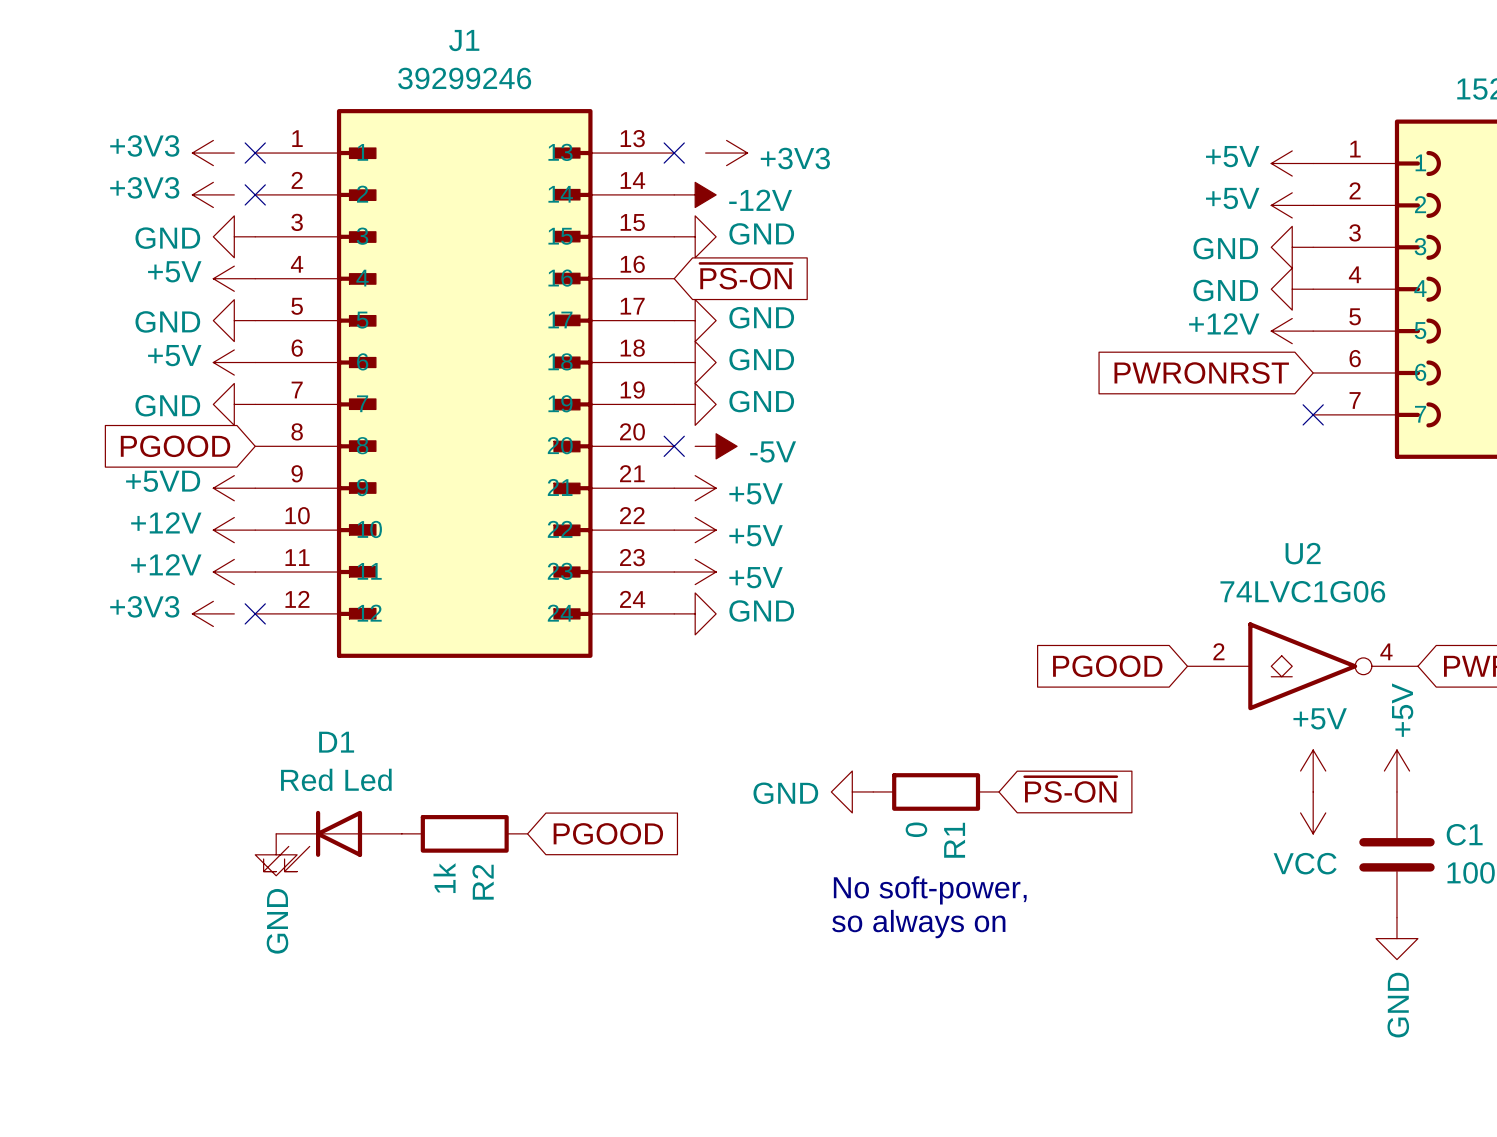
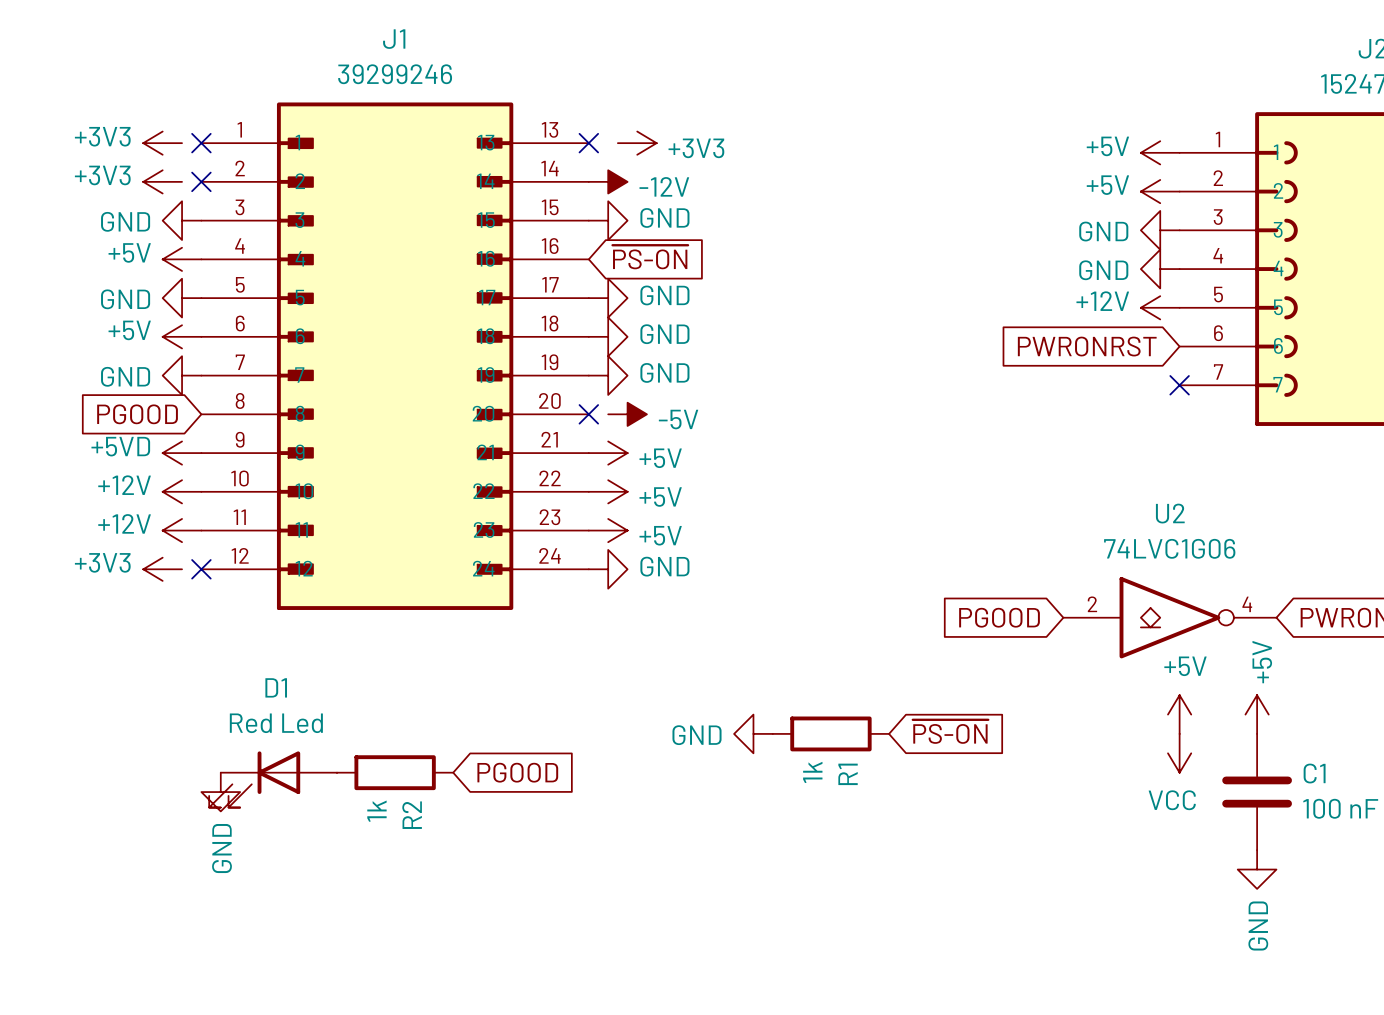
R1 value: 0 (916, 829) -> 1k (812, 772)
text: No soft-power, (930, 890) -> none
text: so always on (918, 924) -> none

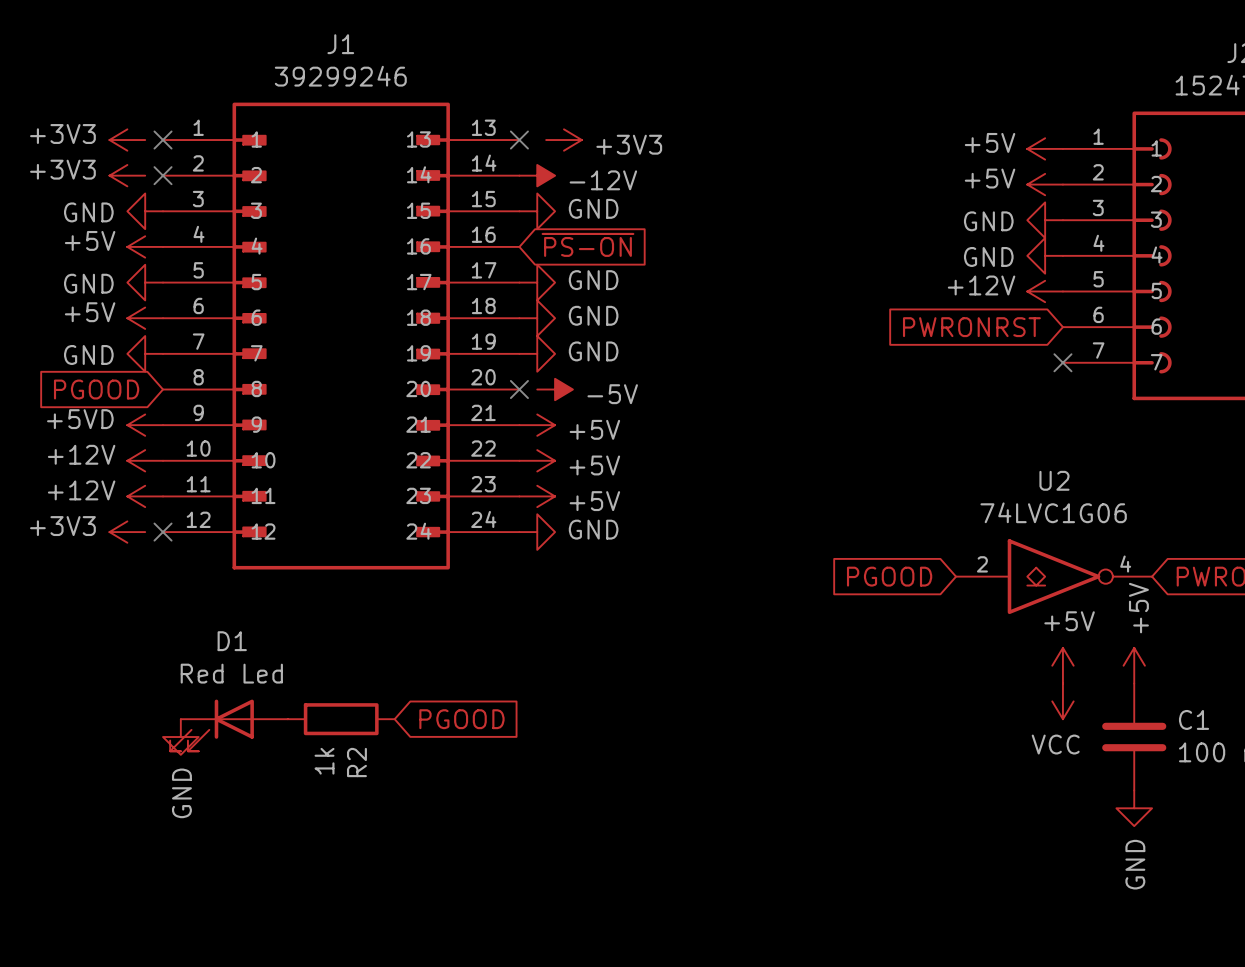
global label: ~{PS-ON} (950, 731) -> none
power symbol: GND (753, 733) -> none
R1: 1k (830, 733) -> none

